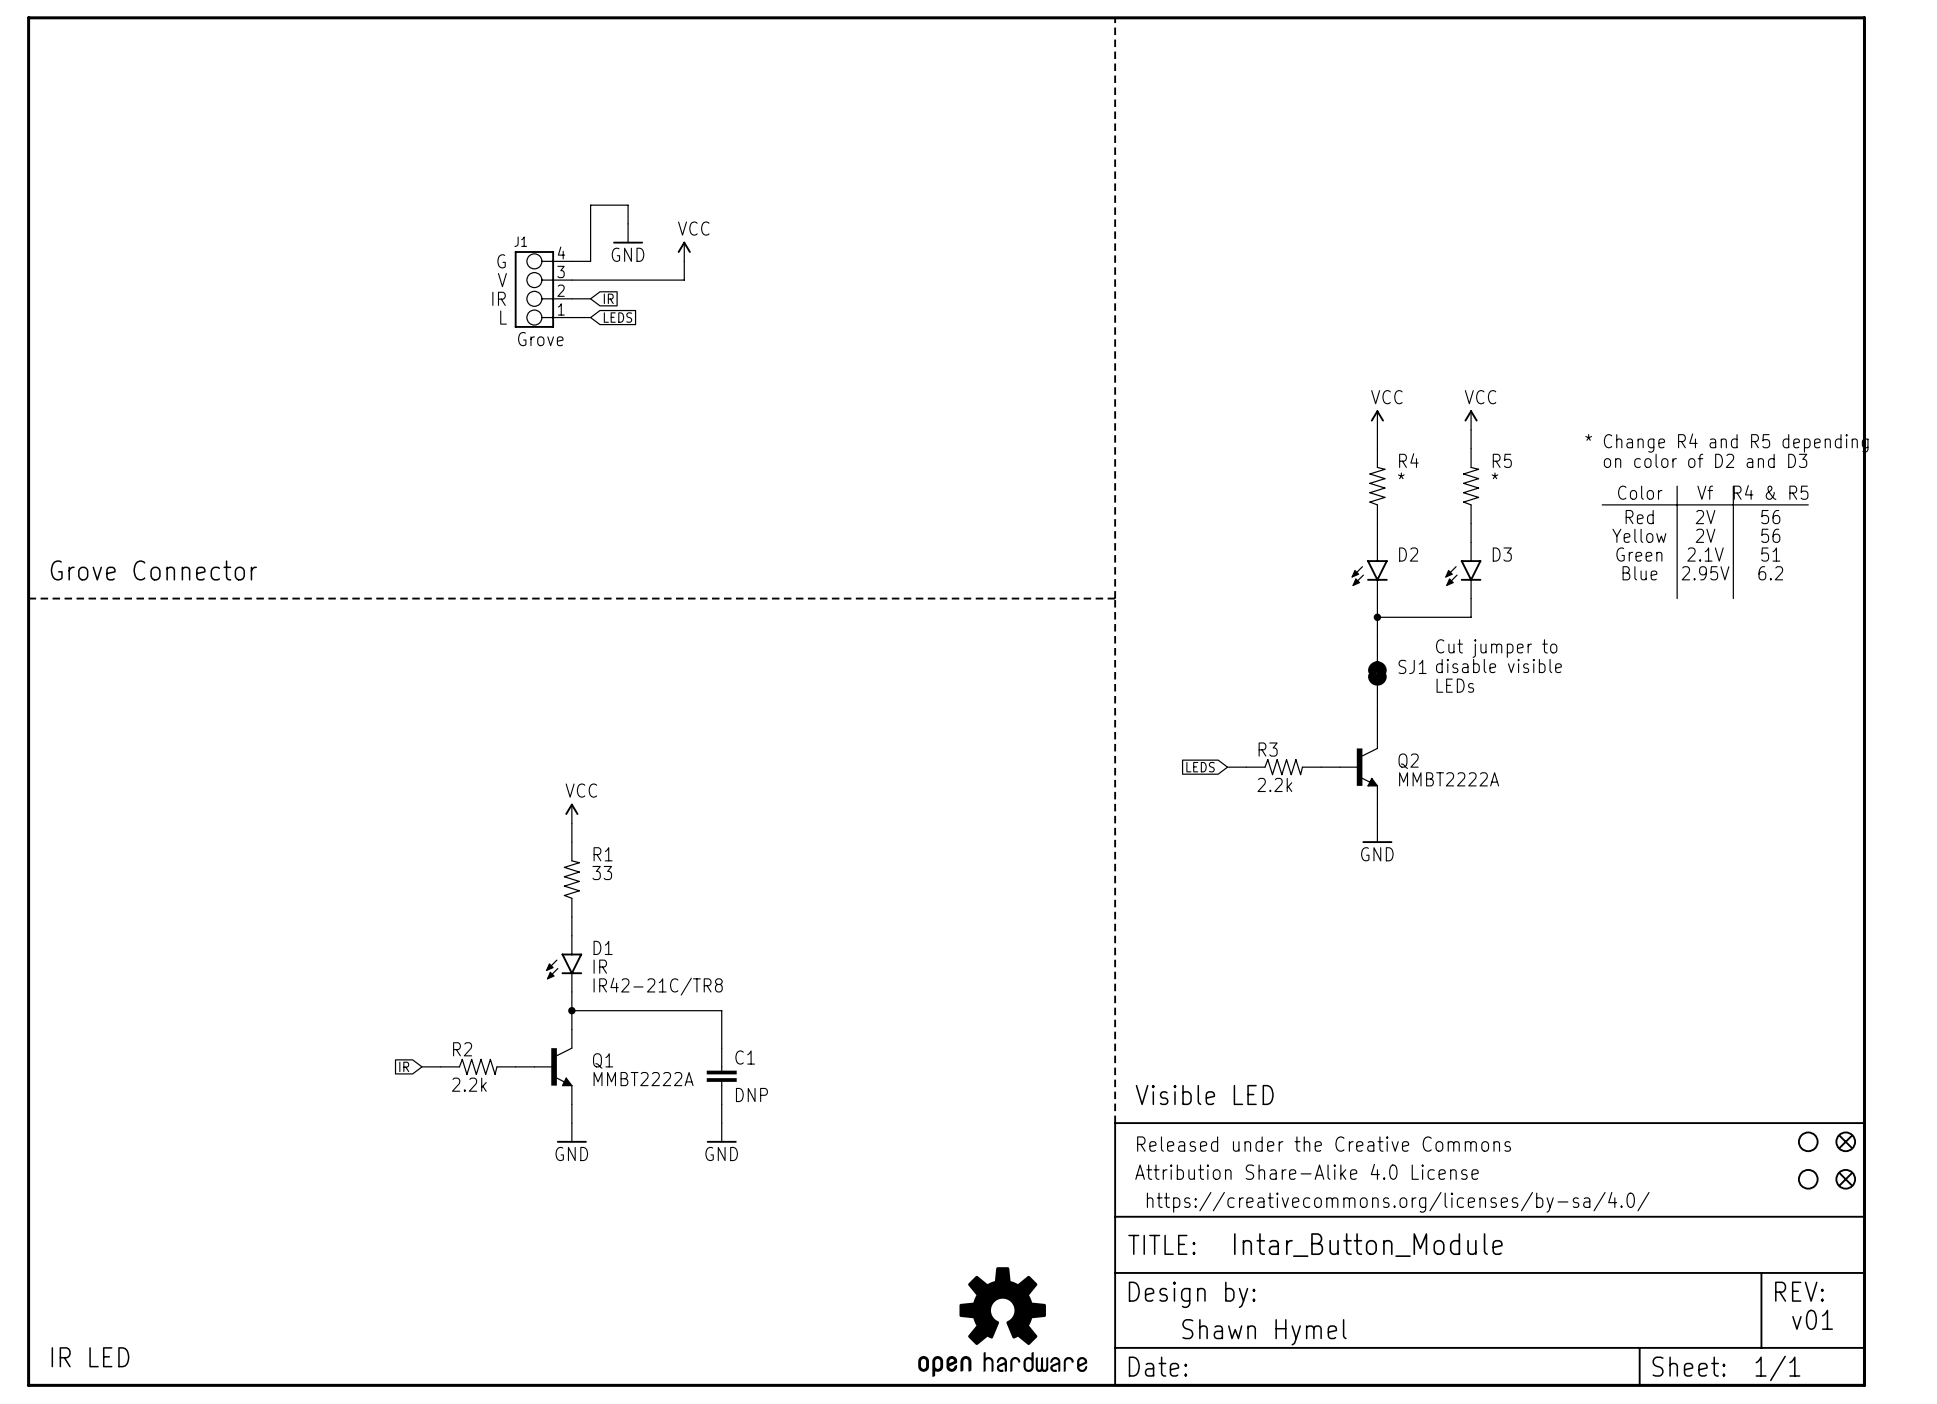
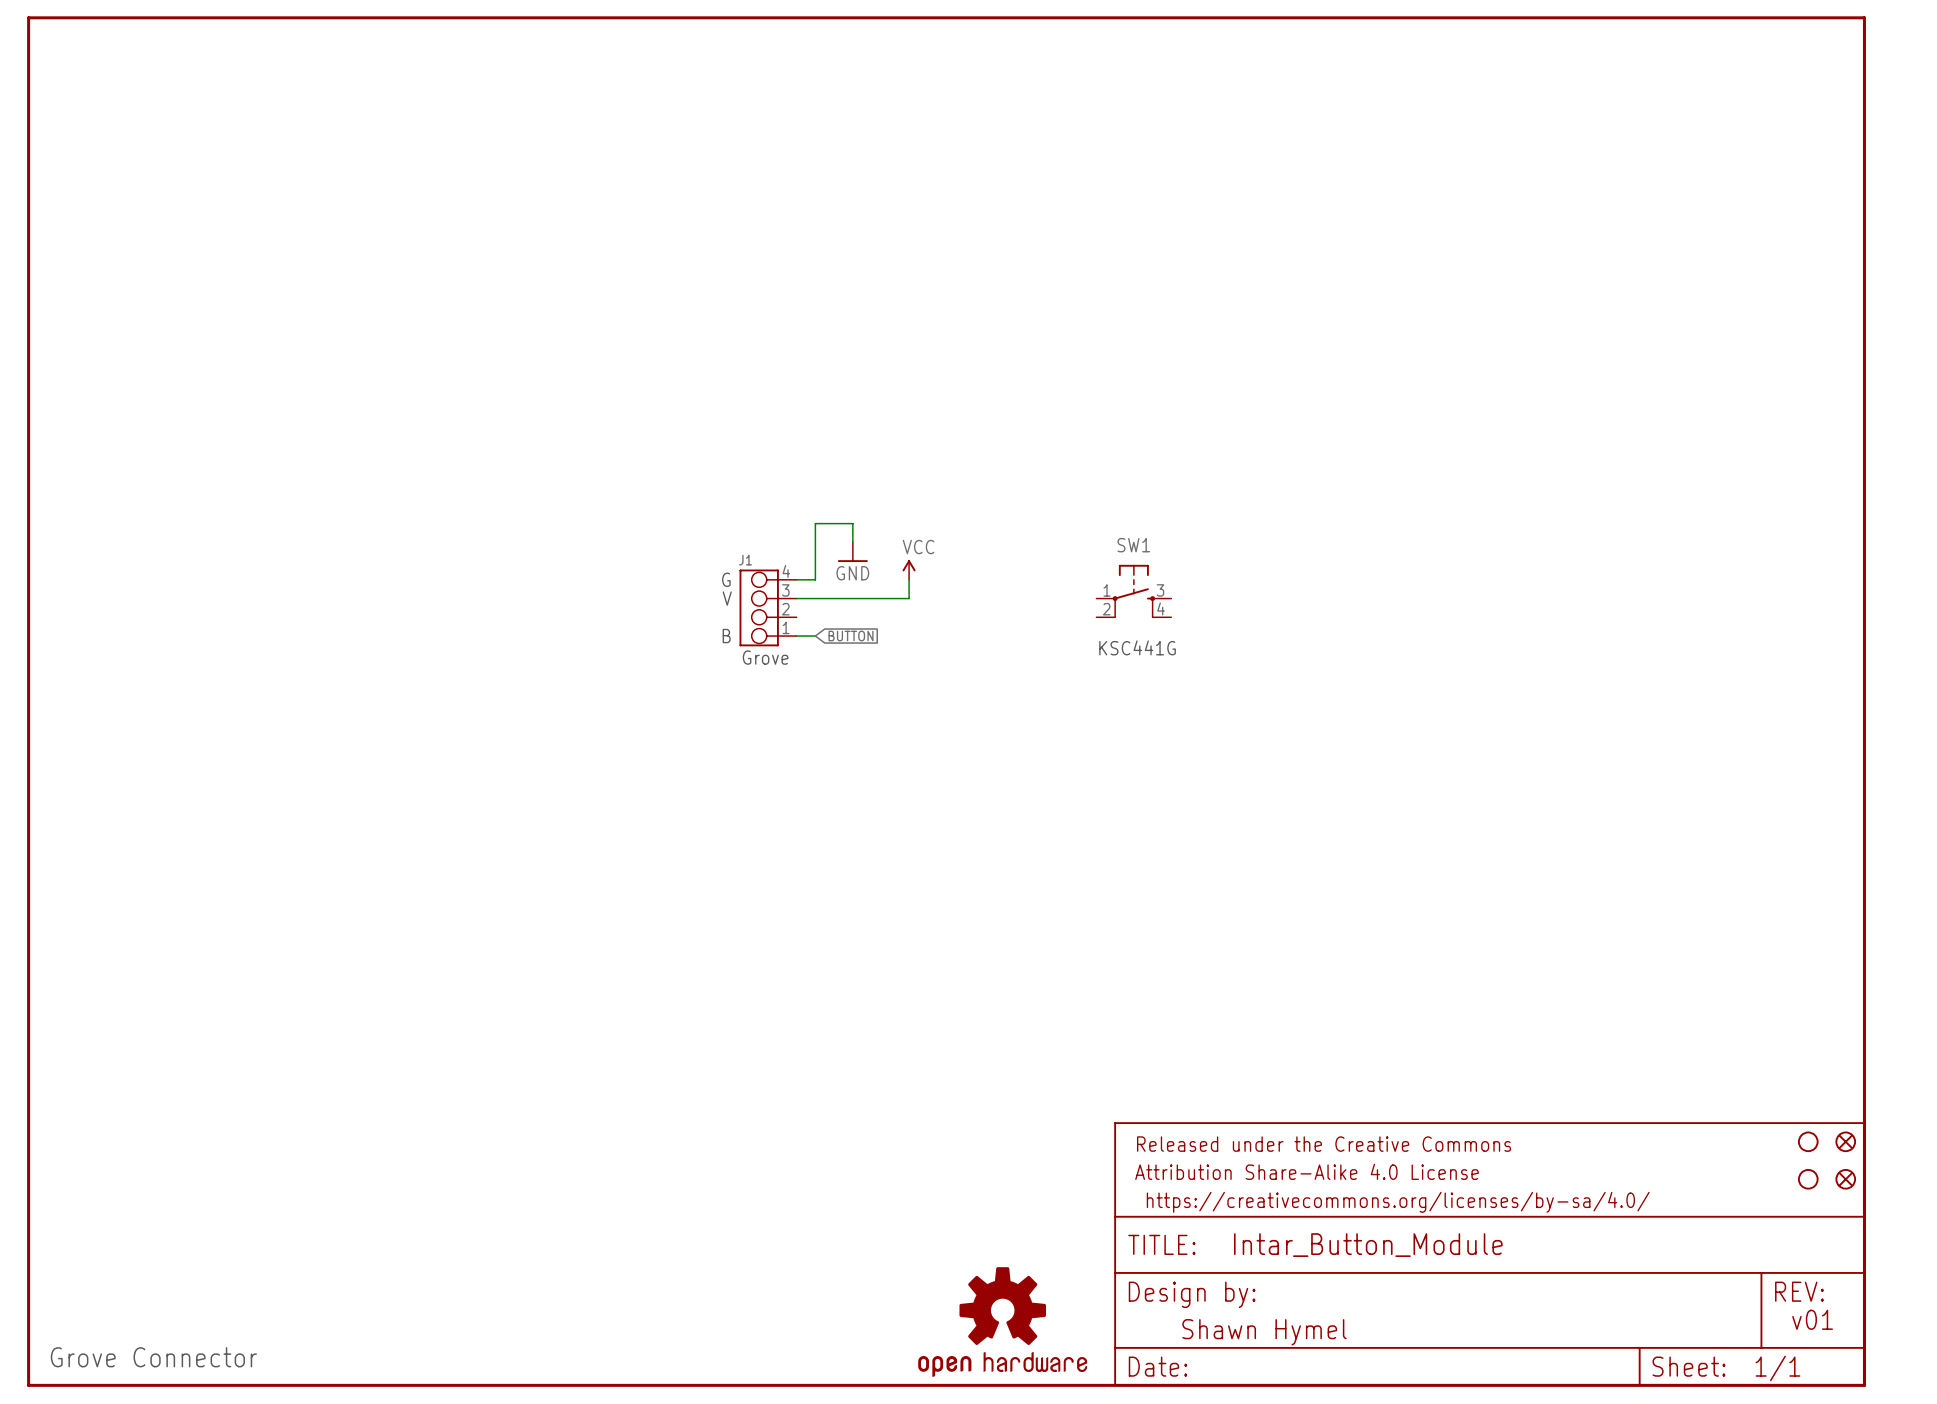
line: (1115, 17) (1115, 1123) -> none
wire: (628, 223) (628, 205) (590, 205) (590, 261) (571, 261) -> none
power symbol: GND (628, 233) -> none
power symbol: VCC (684, 251) -> none
text: G (501, 261) -> none
wire: (684, 261) (684, 280) (571, 280) -> none
text: V (502, 280) -> none
J1 position: (543, 289) -> (768, 607)
text: IR (499, 298) -> none
wire: (571, 298) (590, 298) -> none
global label: IR (608, 298) -> none
text: L (503, 317) -> none
wire: (571, 317) (590, 317) -> none
global label: LEDS (617, 317) -> none
text: Grove (540, 339) -> none
power symbol: VCC (1377, 420) -> none
power symbol: VCC (1471, 420) -> none
wire: (1377, 429) (1377, 448) -> none
wire: (1471, 429) (1471, 448) -> none
text: * Change R4 and R5 depending (1726, 443) -> none
text: on color of D2 and D3 (1705, 460) -> none
R4: * (1377, 486) -> none
R5: * (1471, 486) -> none
line: (1677, 486) (1677, 598) -> none
line: (1733, 486) (1733, 598) -> none
text: Color (1640, 492) -> none
text: Vf (1705, 492) -> none
text: R4 & R5 (1771, 492) -> none
line: (1602, 504) (1808, 504) -> none
text: Red (1639, 517) -> none
text: 2V (1705, 517) -> none
text: 56 (1770, 517) -> none
wire: (1377, 523) (1377, 542) -> none
wire: (1471, 523) (1471, 542) -> none
text: Yellow (1639, 535) -> none
text: 2V (1705, 535) -> none
text: 56 (1770, 535) -> none
wire: none -> (852, 542) (852, 523) (815, 523) (815, 579) (796, 579)
power symbol: none -> GND (852, 552)
text: Green (1639, 554) -> none
text: 2.1V (1705, 554) -> none
text: 51 (1770, 554) -> none
power symbol: none -> VCC (909, 569)
text: Grove Connector (153, 570) -> none
D2: (1369, 570) -> none
D3: (1463, 570) -> none
text: Blue (1639, 573) -> none
text: 2.95V (1705, 573) -> none
text: 6.2 (1770, 573) -> none
text: none -> G (726, 579)
wire: none -> (909, 579) (909, 598) (796, 598)
SW1: none -> (1133, 591)
line: (28, 598) (1115, 598) -> none
text: none -> V (727, 598)
wire: (1377, 598) (1377, 636) -> none
wire: (1471, 598) (1471, 617) (1377, 617) -> none
junction: (1377, 617) -> none
text: none -> B (726, 636)
wire: none -> (796, 636) (815, 636)
global label: none -> BUTTON (851, 636)
text: none -> KSC441G (1137, 647)
text: Cut jumper to (1496, 648) -> none
text: none -> Grove (765, 657)
text: disable visible (1498, 666) -> none
SJ1: (1377, 673) -> none
text: LEDs (1455, 685) -> none
wire: (1377, 710) (1377, 729) -> none
global label: LEDS (1200, 767) -> none
wire: (1227, 767) (1246, 767) -> none
R3: 2.2k (1283, 767) -> none
wire: (1321, 767) (1339, 767) -> none
Q2: MMBT2222A (1358, 767) -> none
wire: (1377, 804) (1377, 823) -> none
power symbol: VCC (571, 813) -> none
wire: (571, 823) (571, 842) -> none
power symbol: GND (1377, 833) -> none
R1: 33 (571, 879) -> none
wire: (571, 917) (571, 935) -> none
D1: IR (564, 963) -> none
wire: (571, 991) (571, 1029) -> none
wire: (571, 1010) (721, 1010) (721, 1048) -> none
junction: (571, 1010) -> none
global label: IR (404, 1066) -> none
wire: (422, 1066) (440, 1066) -> none
R2: 2.2k (478, 1066) -> none
wire: (515, 1066) (534, 1066) -> none
Q1: MMBT2222A (553, 1066) -> none
C1: DNP (721, 1076) -> none
text: Visible LED (1204, 1094) -> none
wire: (571, 1104) (571, 1123) -> none
wire: (721, 1104) (721, 1123) -> none
power symbol: GND (571, 1132) -> none
power symbol: GND (721, 1132) -> none
text: IR LED (90, 1357) -> Grove Connector (153, 1357)

